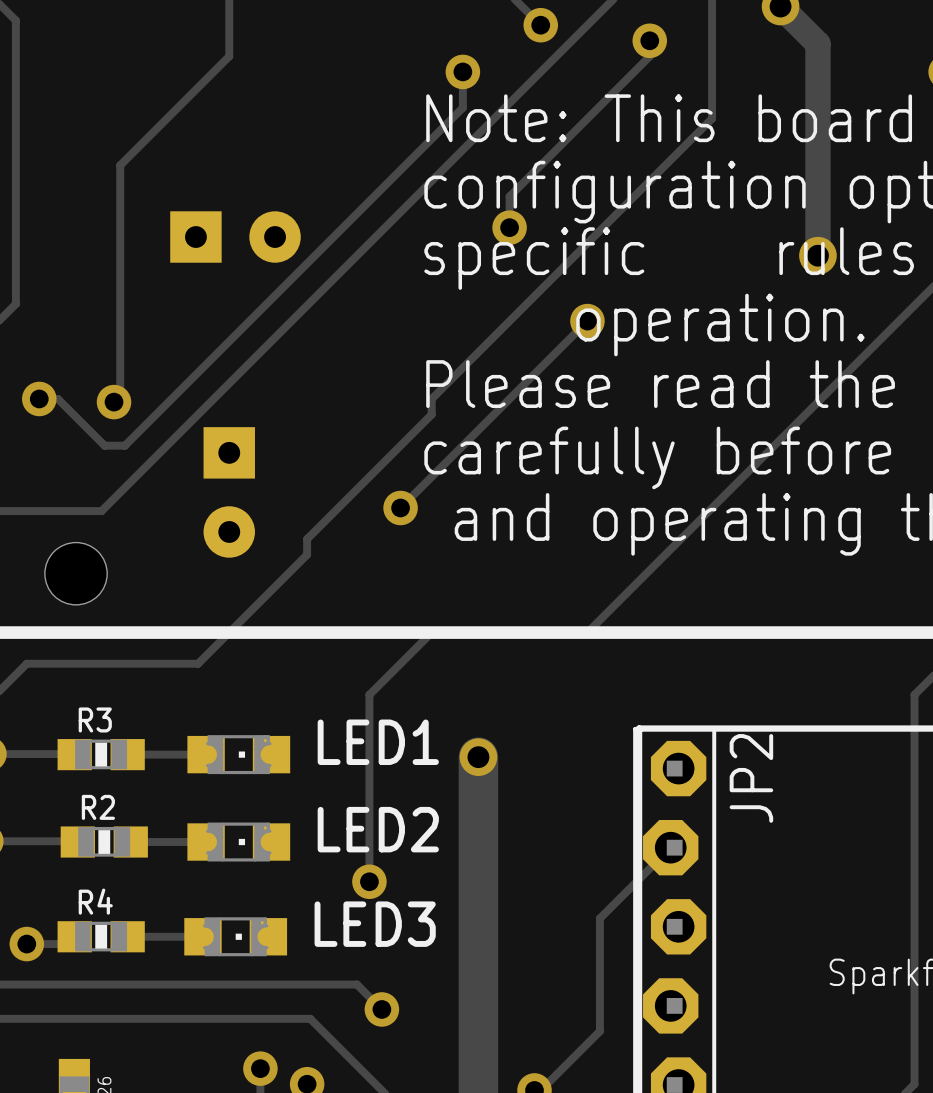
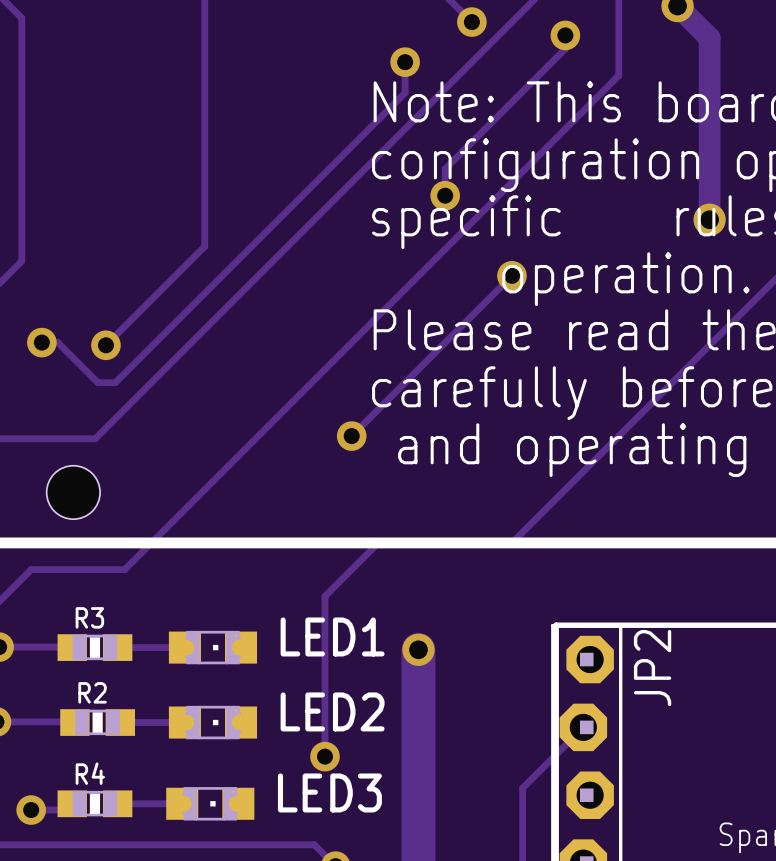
track: (229, 56) (120, 165) (120, 395) -> (204, 48) (204, 246) (111, 339)
track: (712, 87) (712, 118) (431, 398) (431, 414) (307, 539) (307, 554) (198, 663) (135, 663) -> (618, 75) (124, 569)
part: (235, 237) -> none
part: (229, 492) -> none

